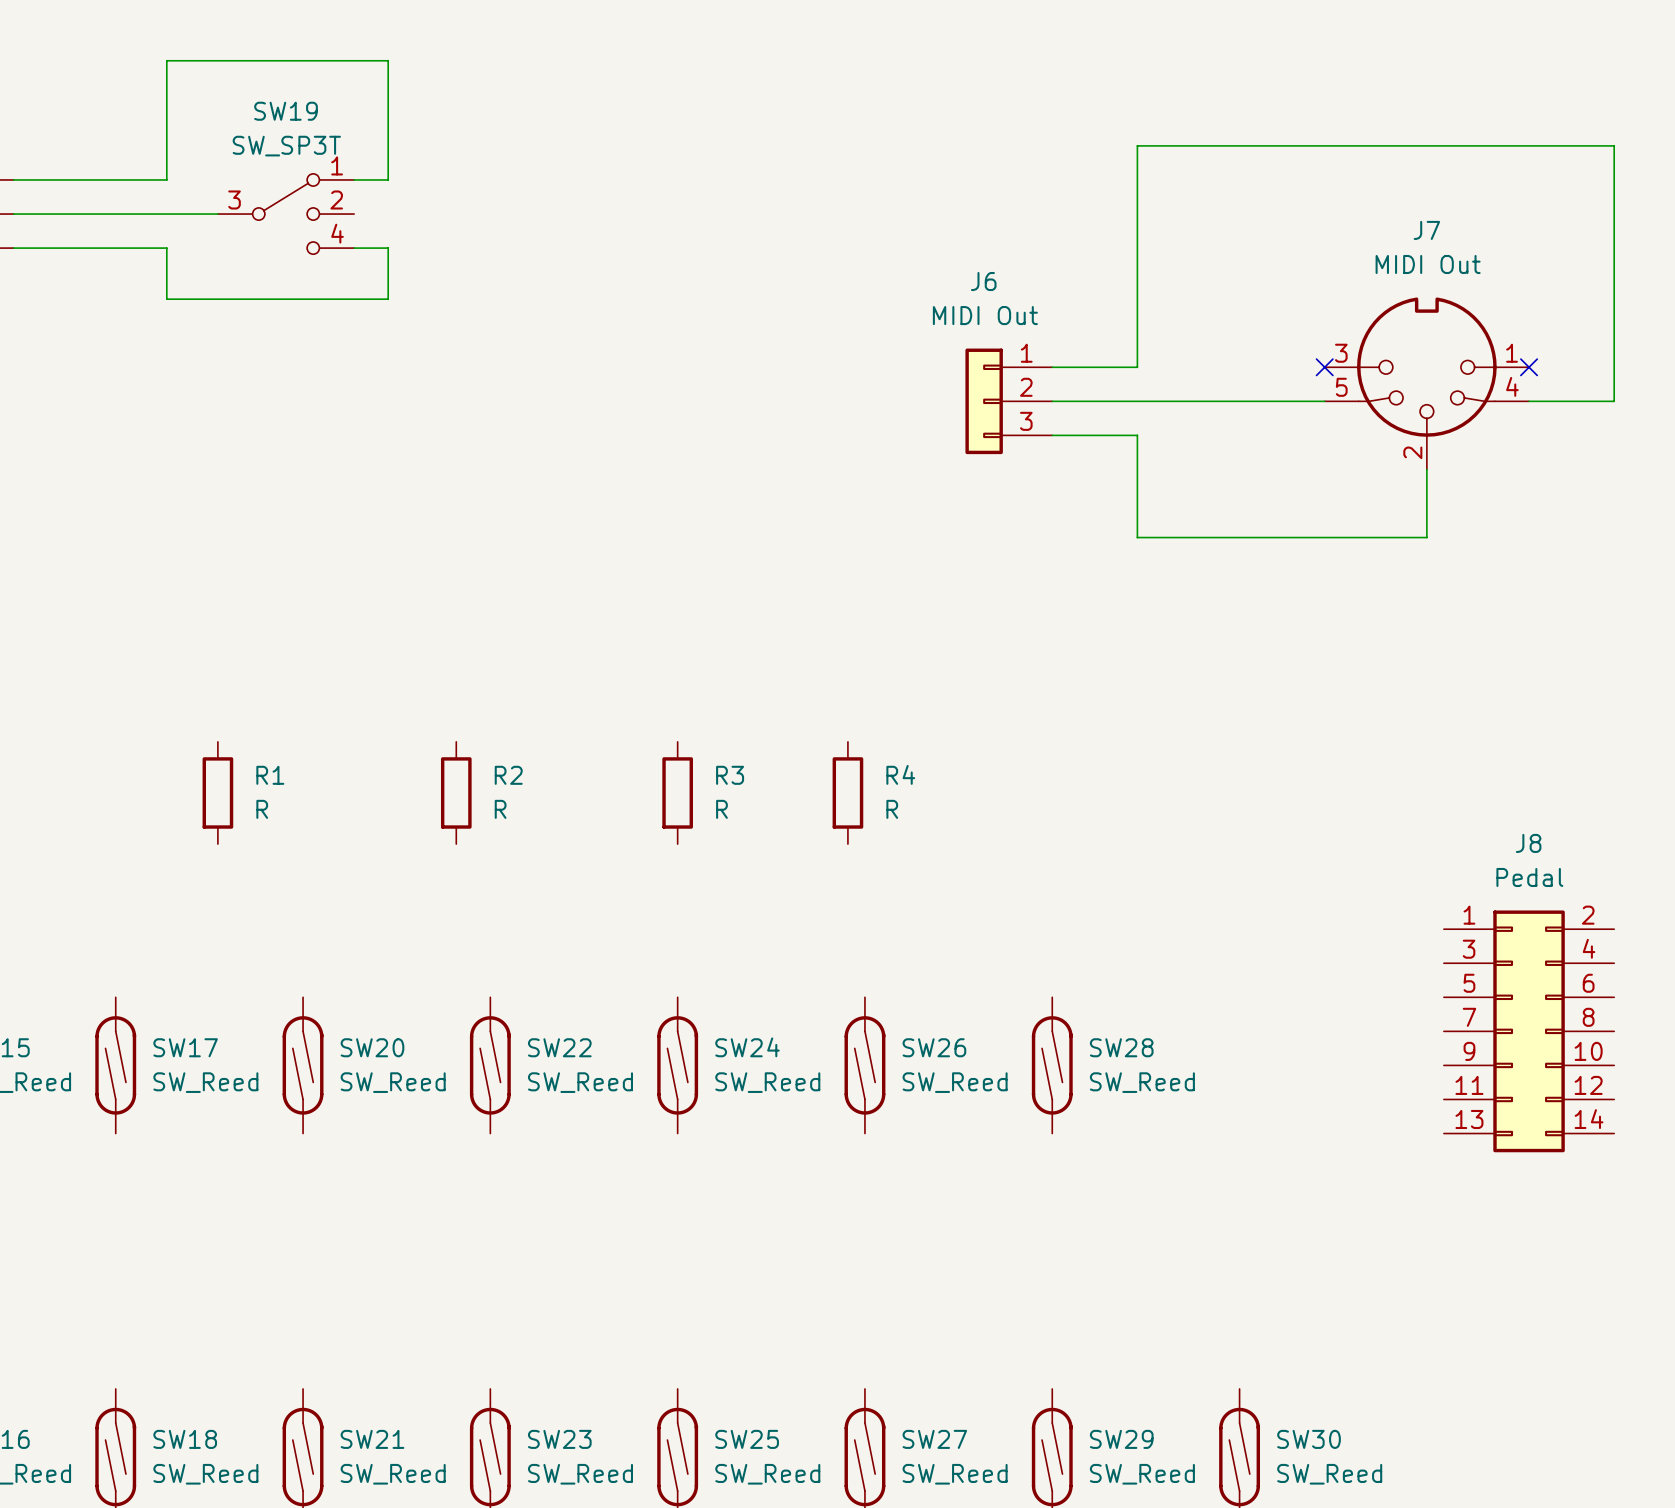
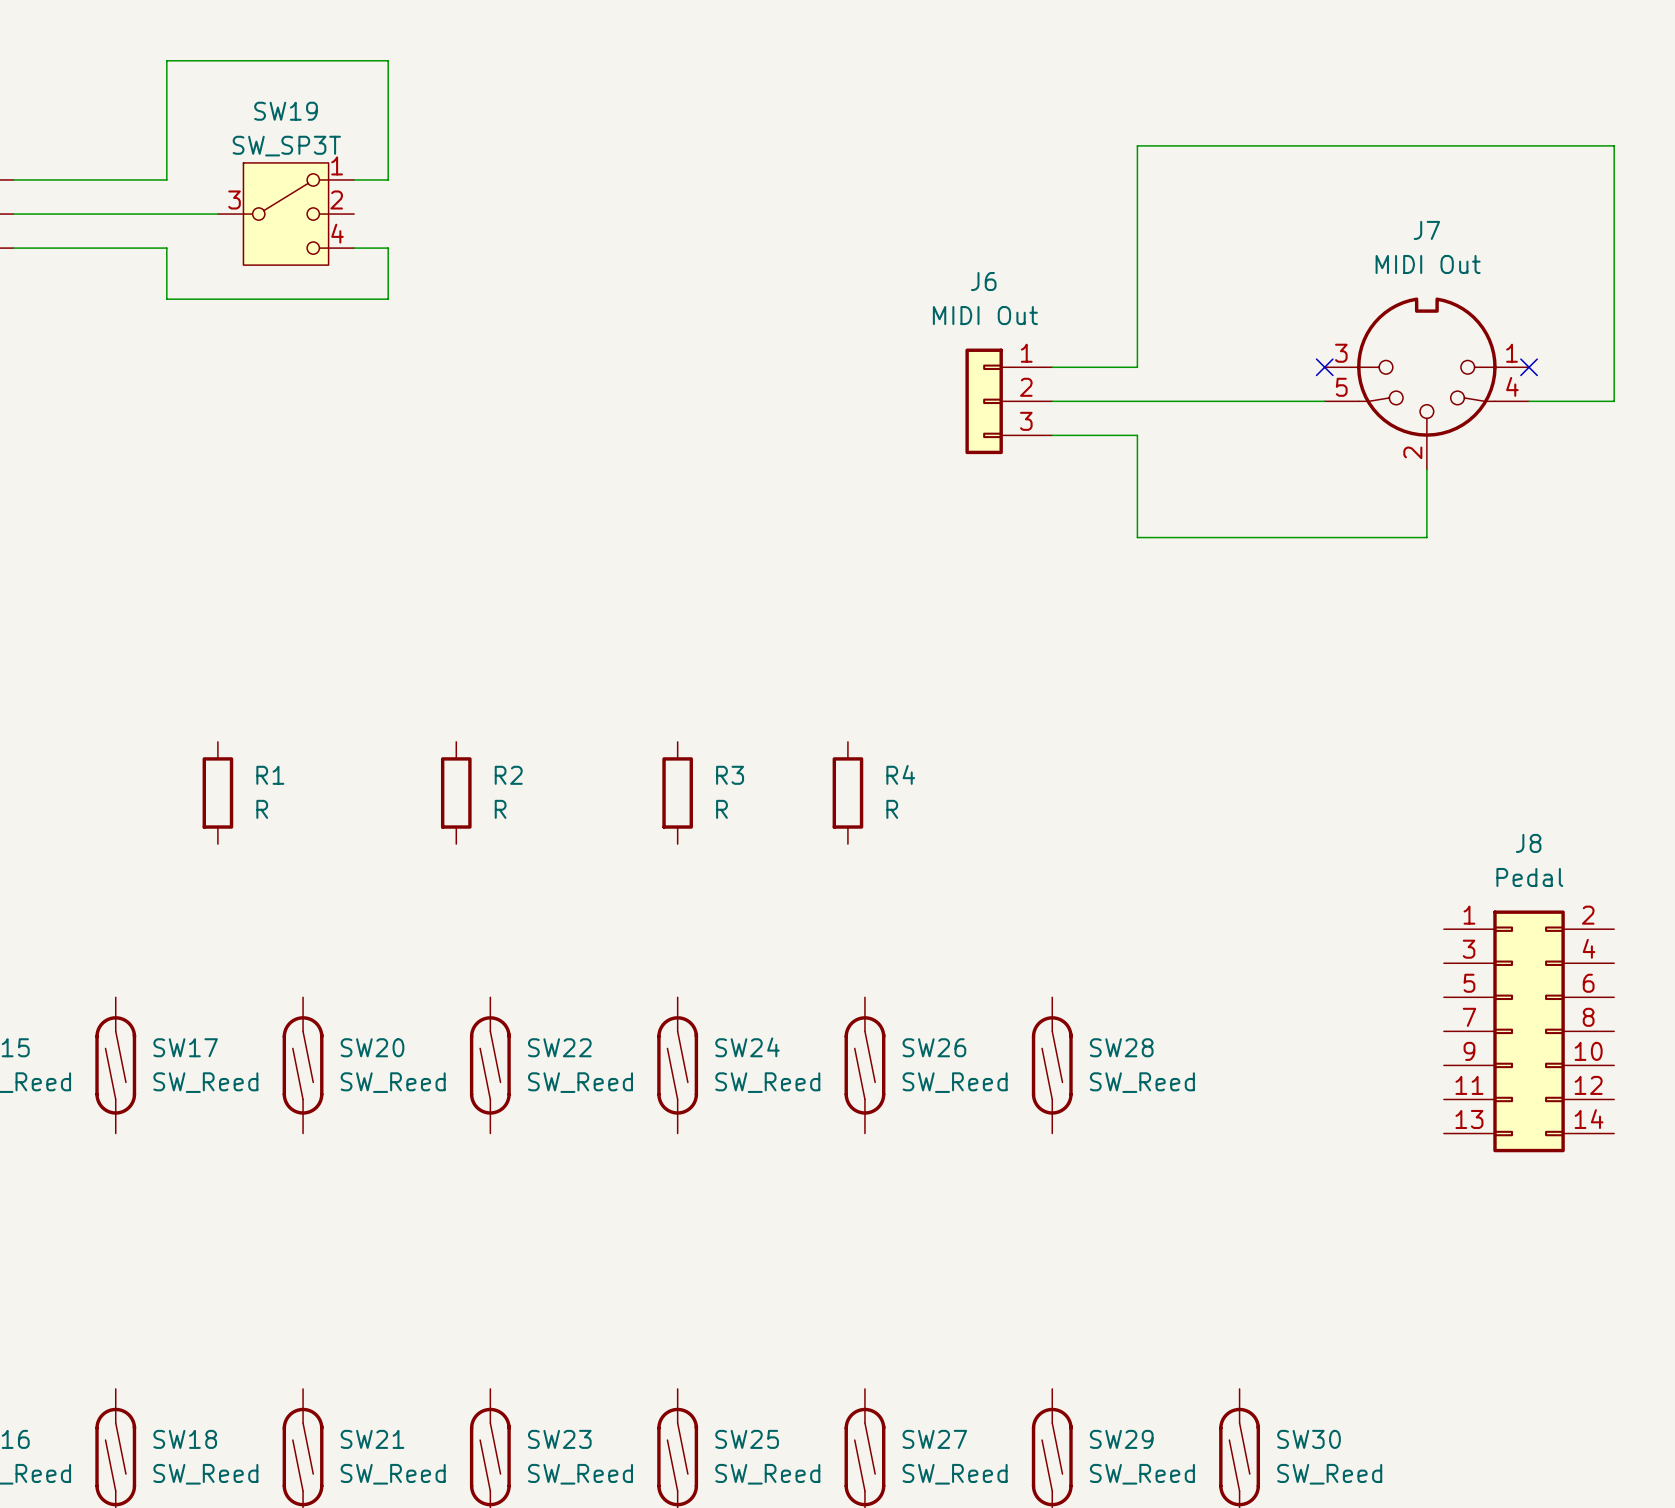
SW19 symbol: [217, 173, 355, 255] -> [217, 162, 355, 266]

